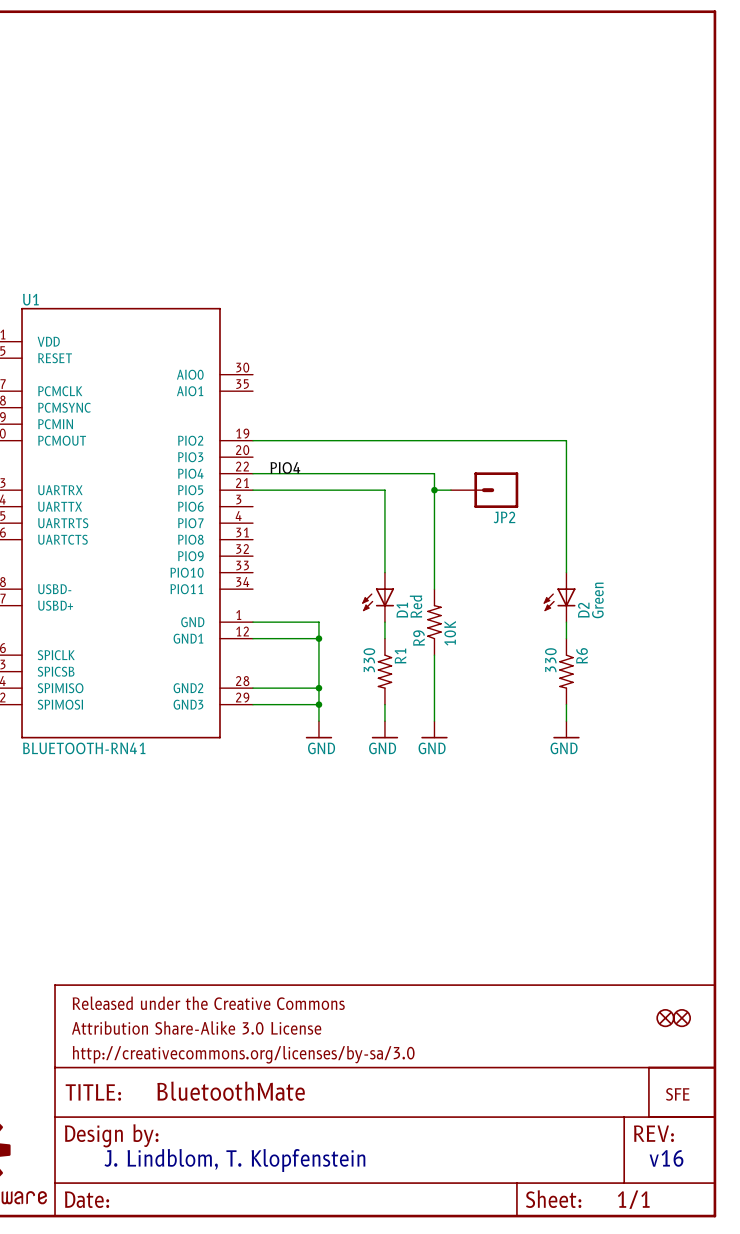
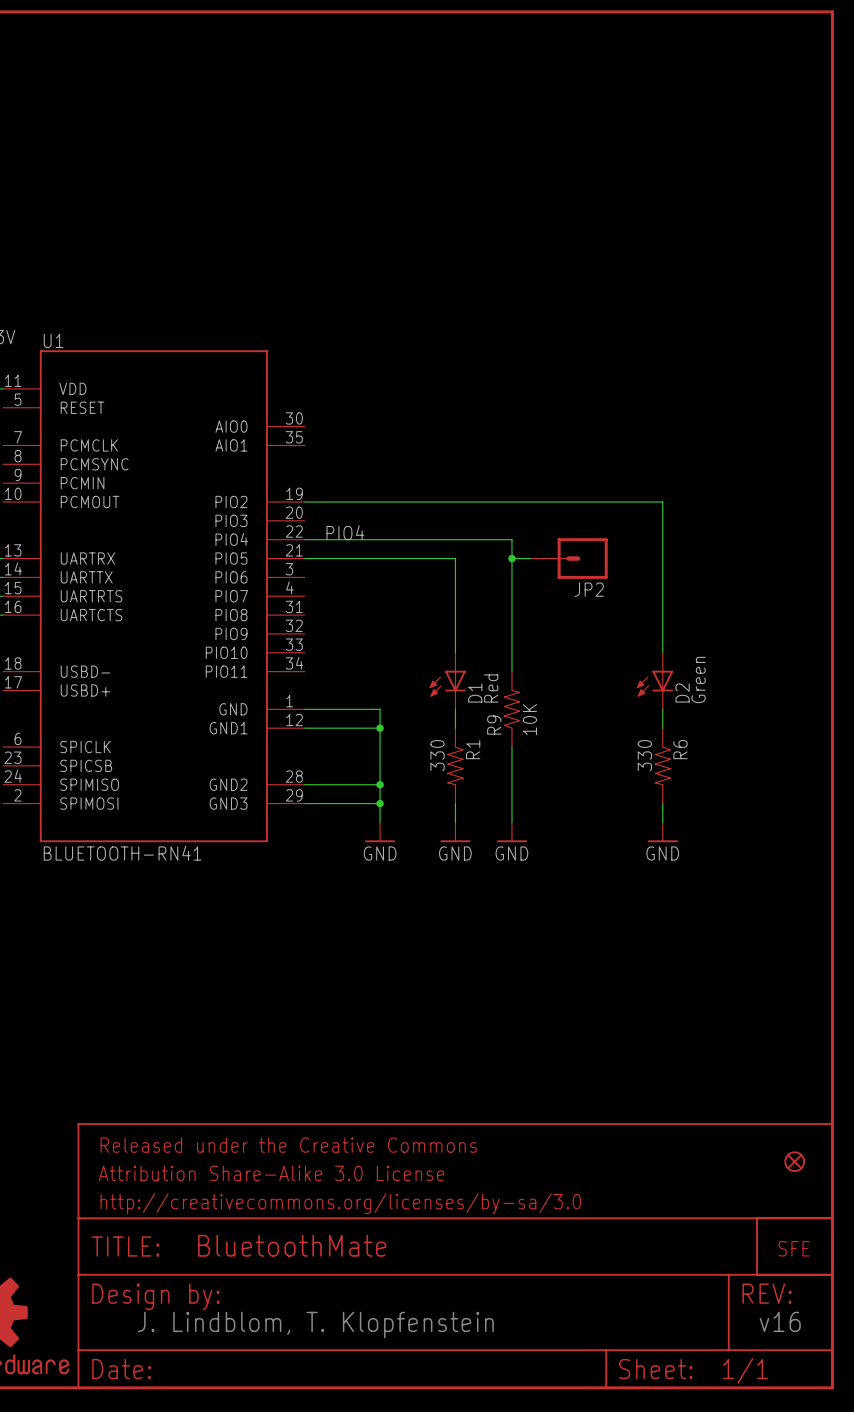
part: (665, 1018) -> none

